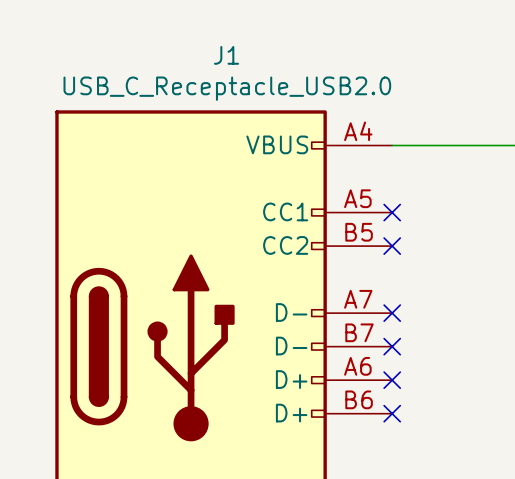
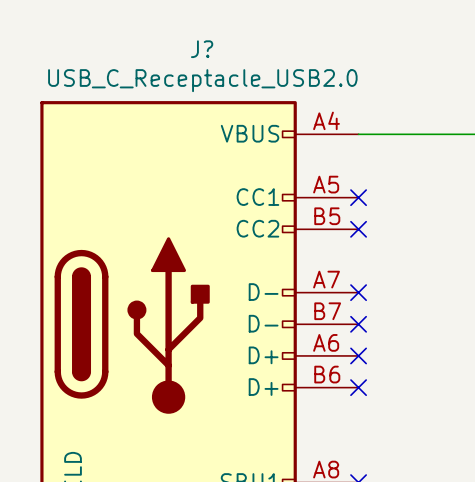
J1 name: J1 (226, 55) -> J? (202, 49)

